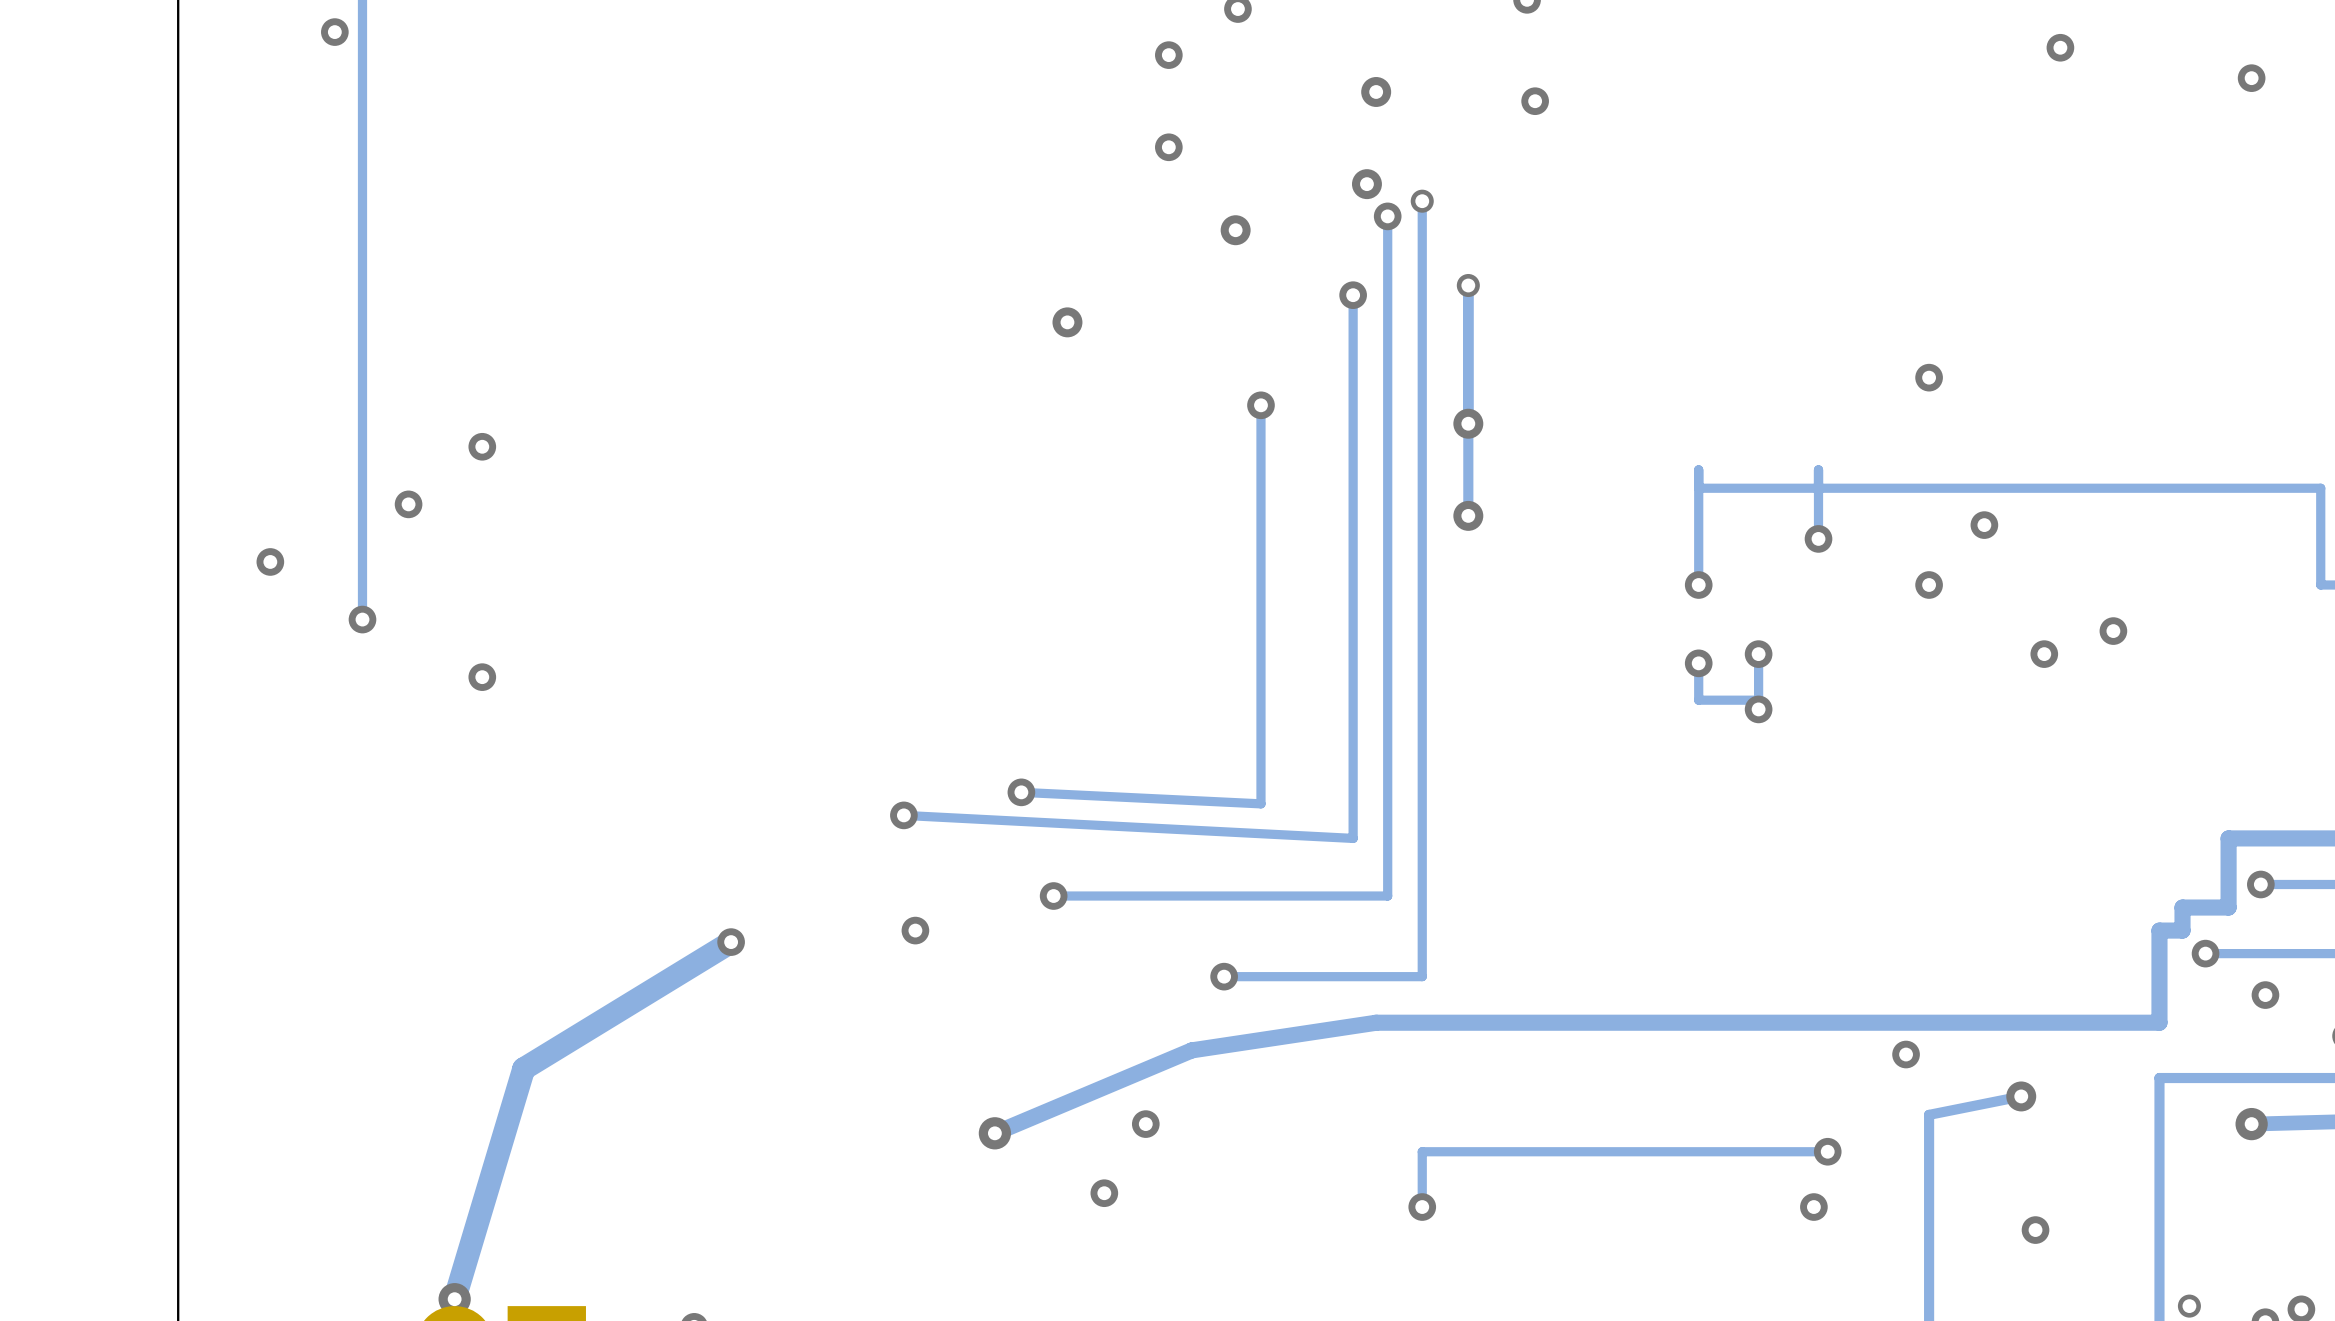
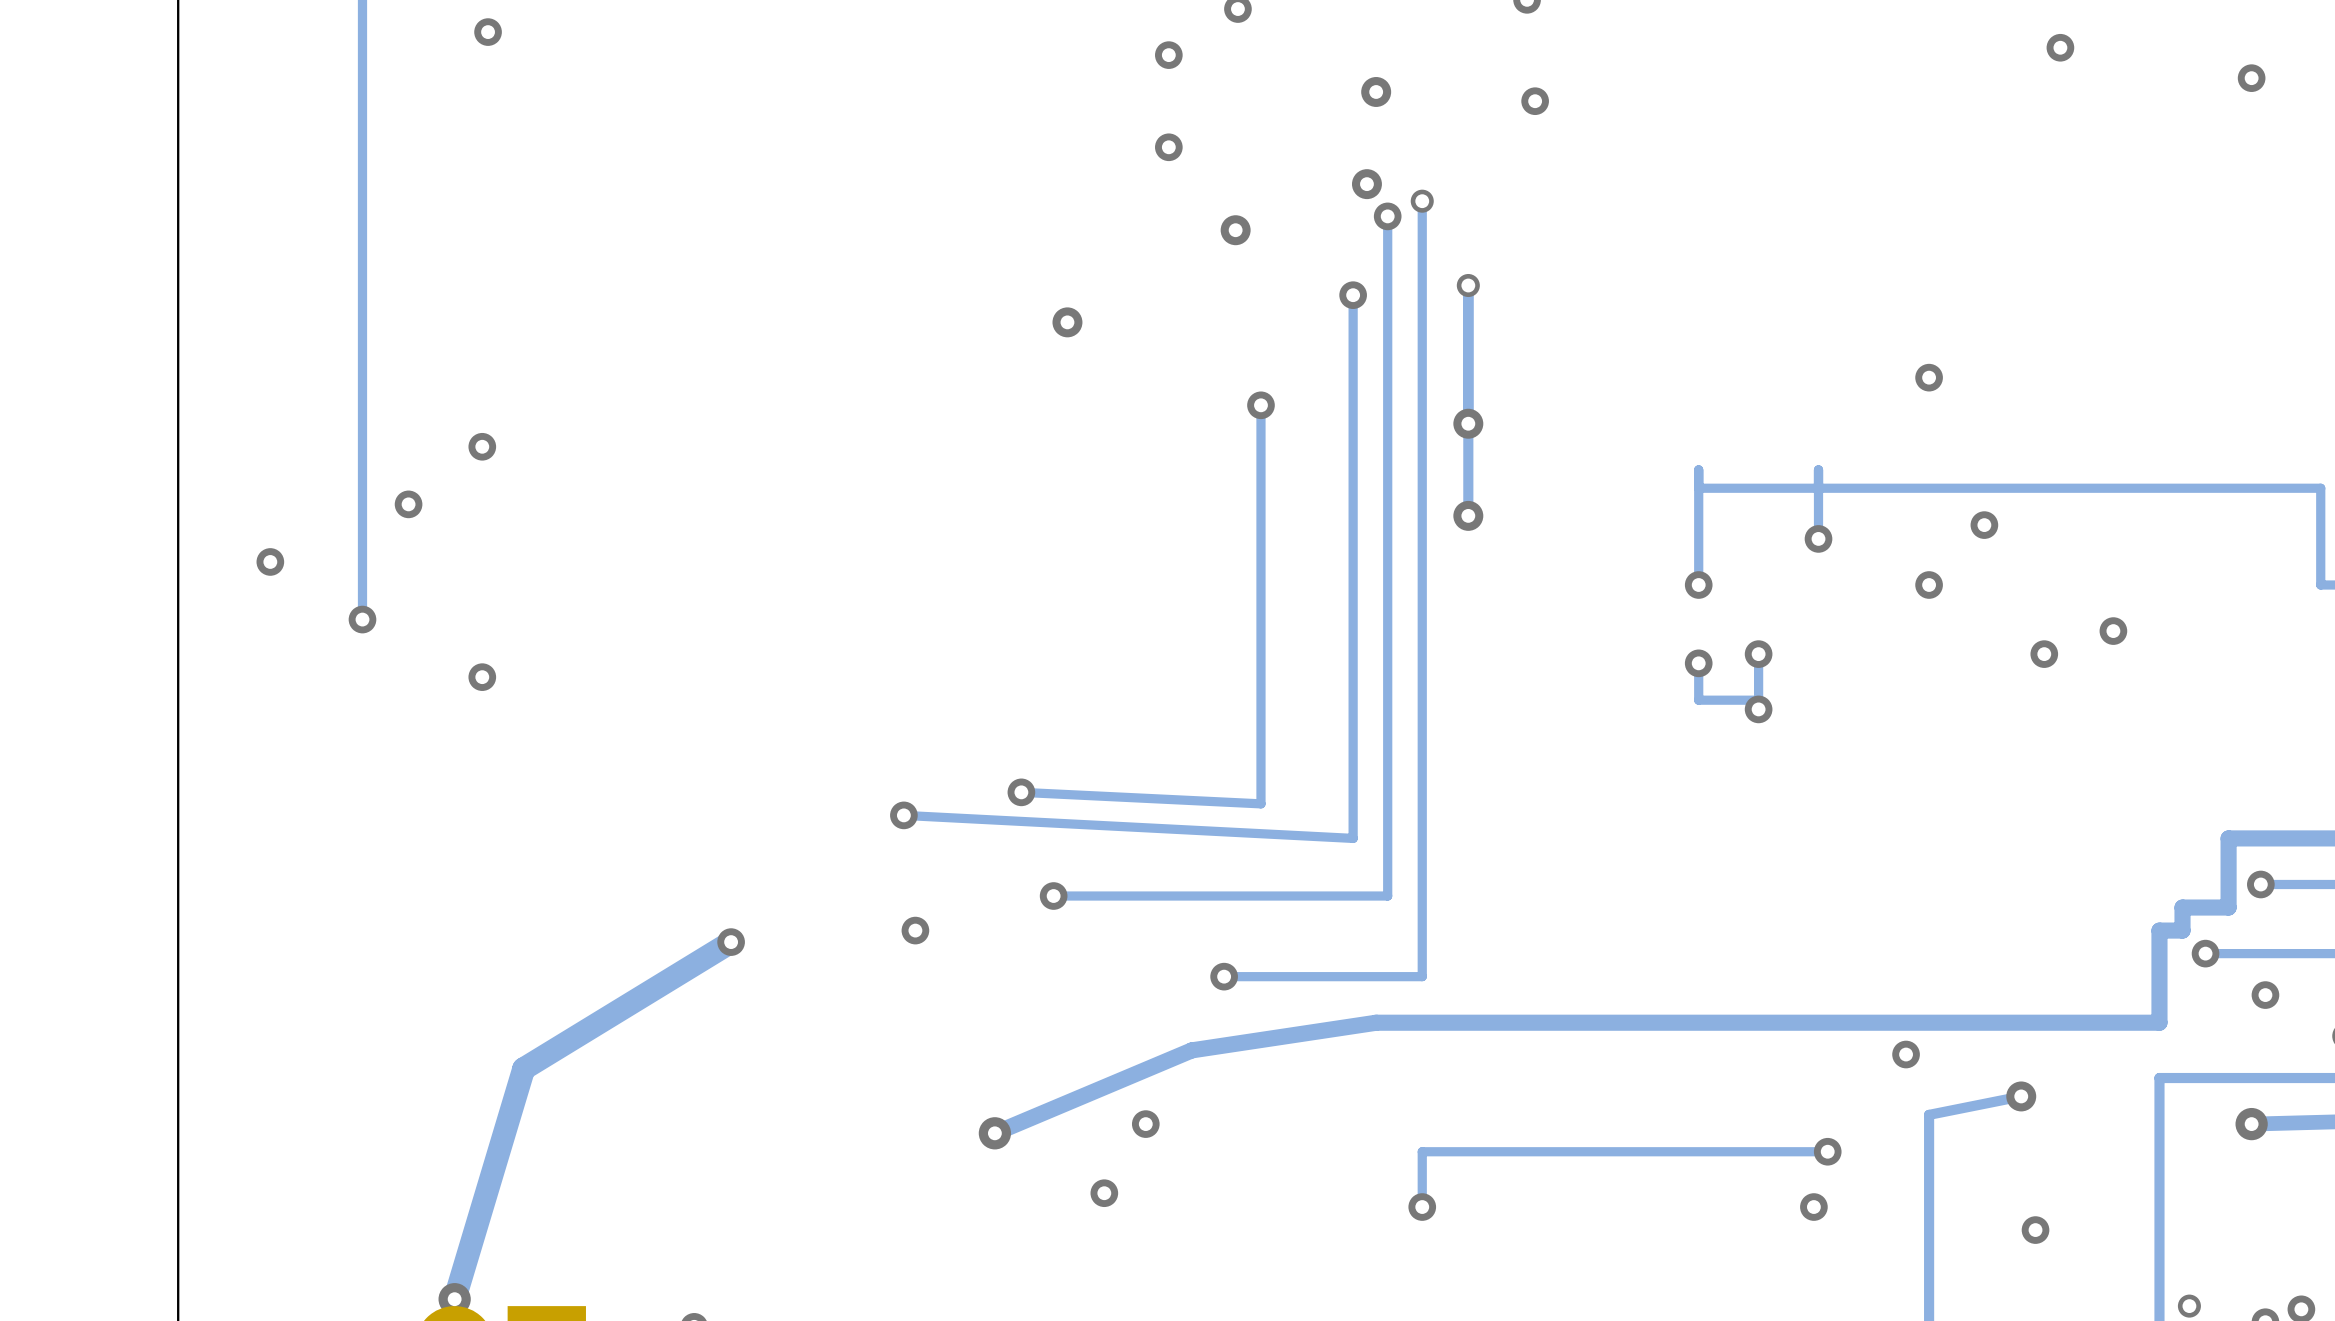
via: (334, 32) -> none
via: none -> (488, 32)

